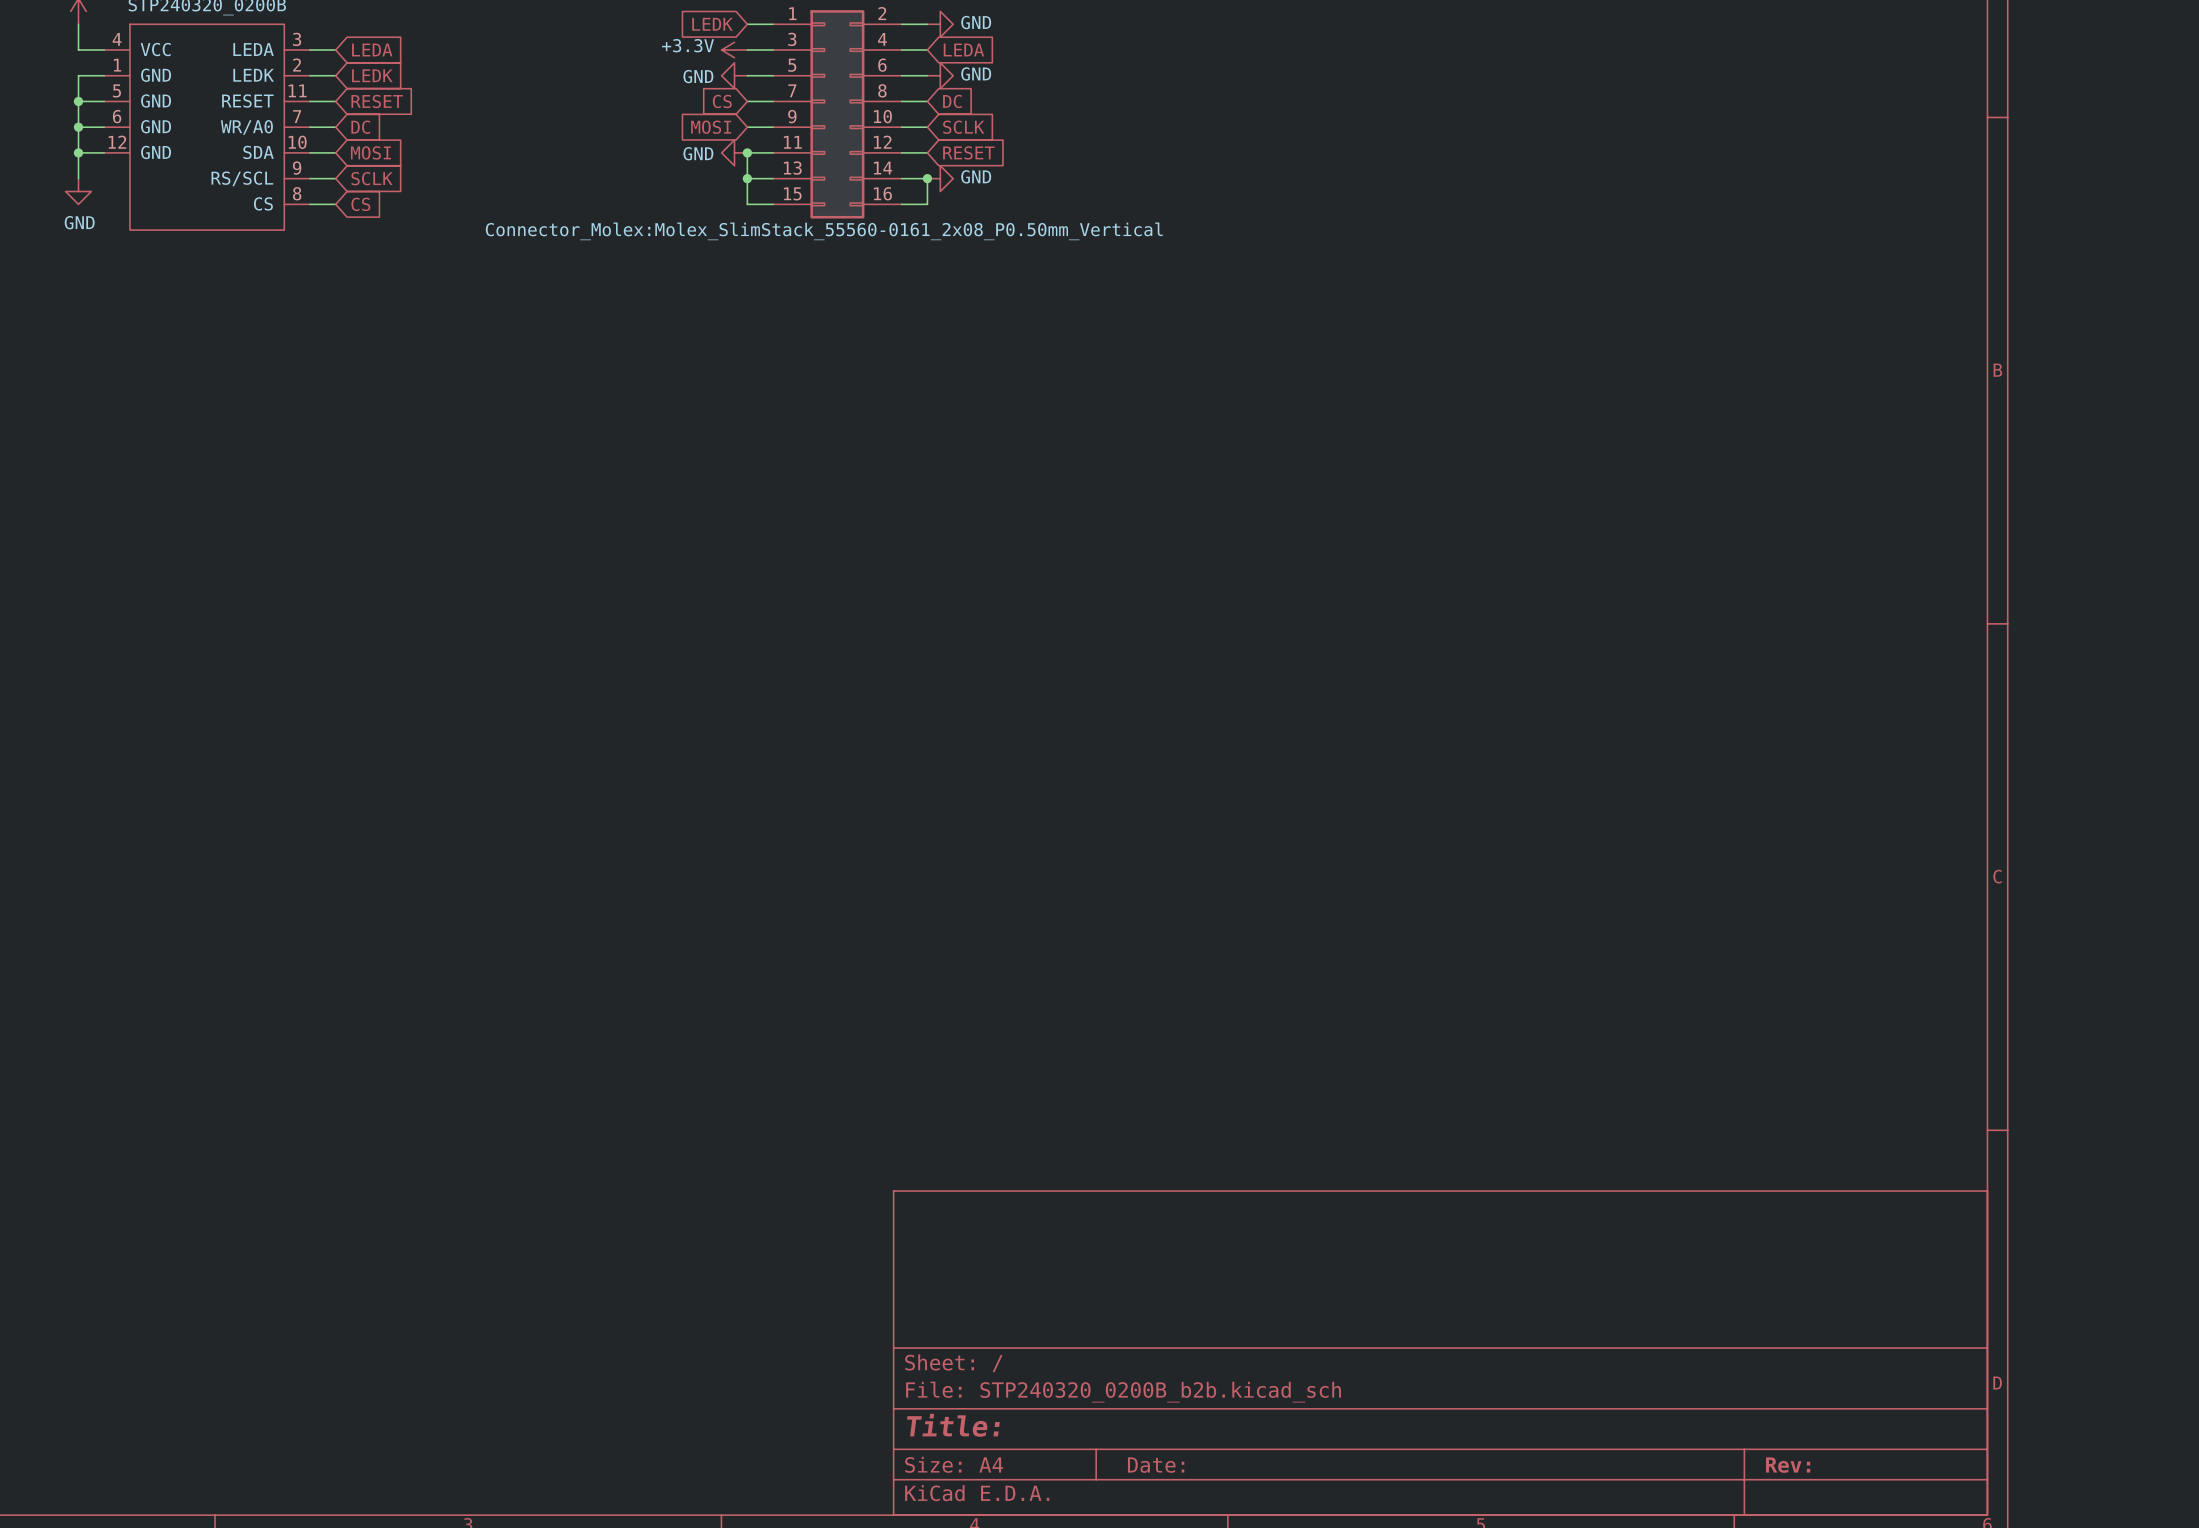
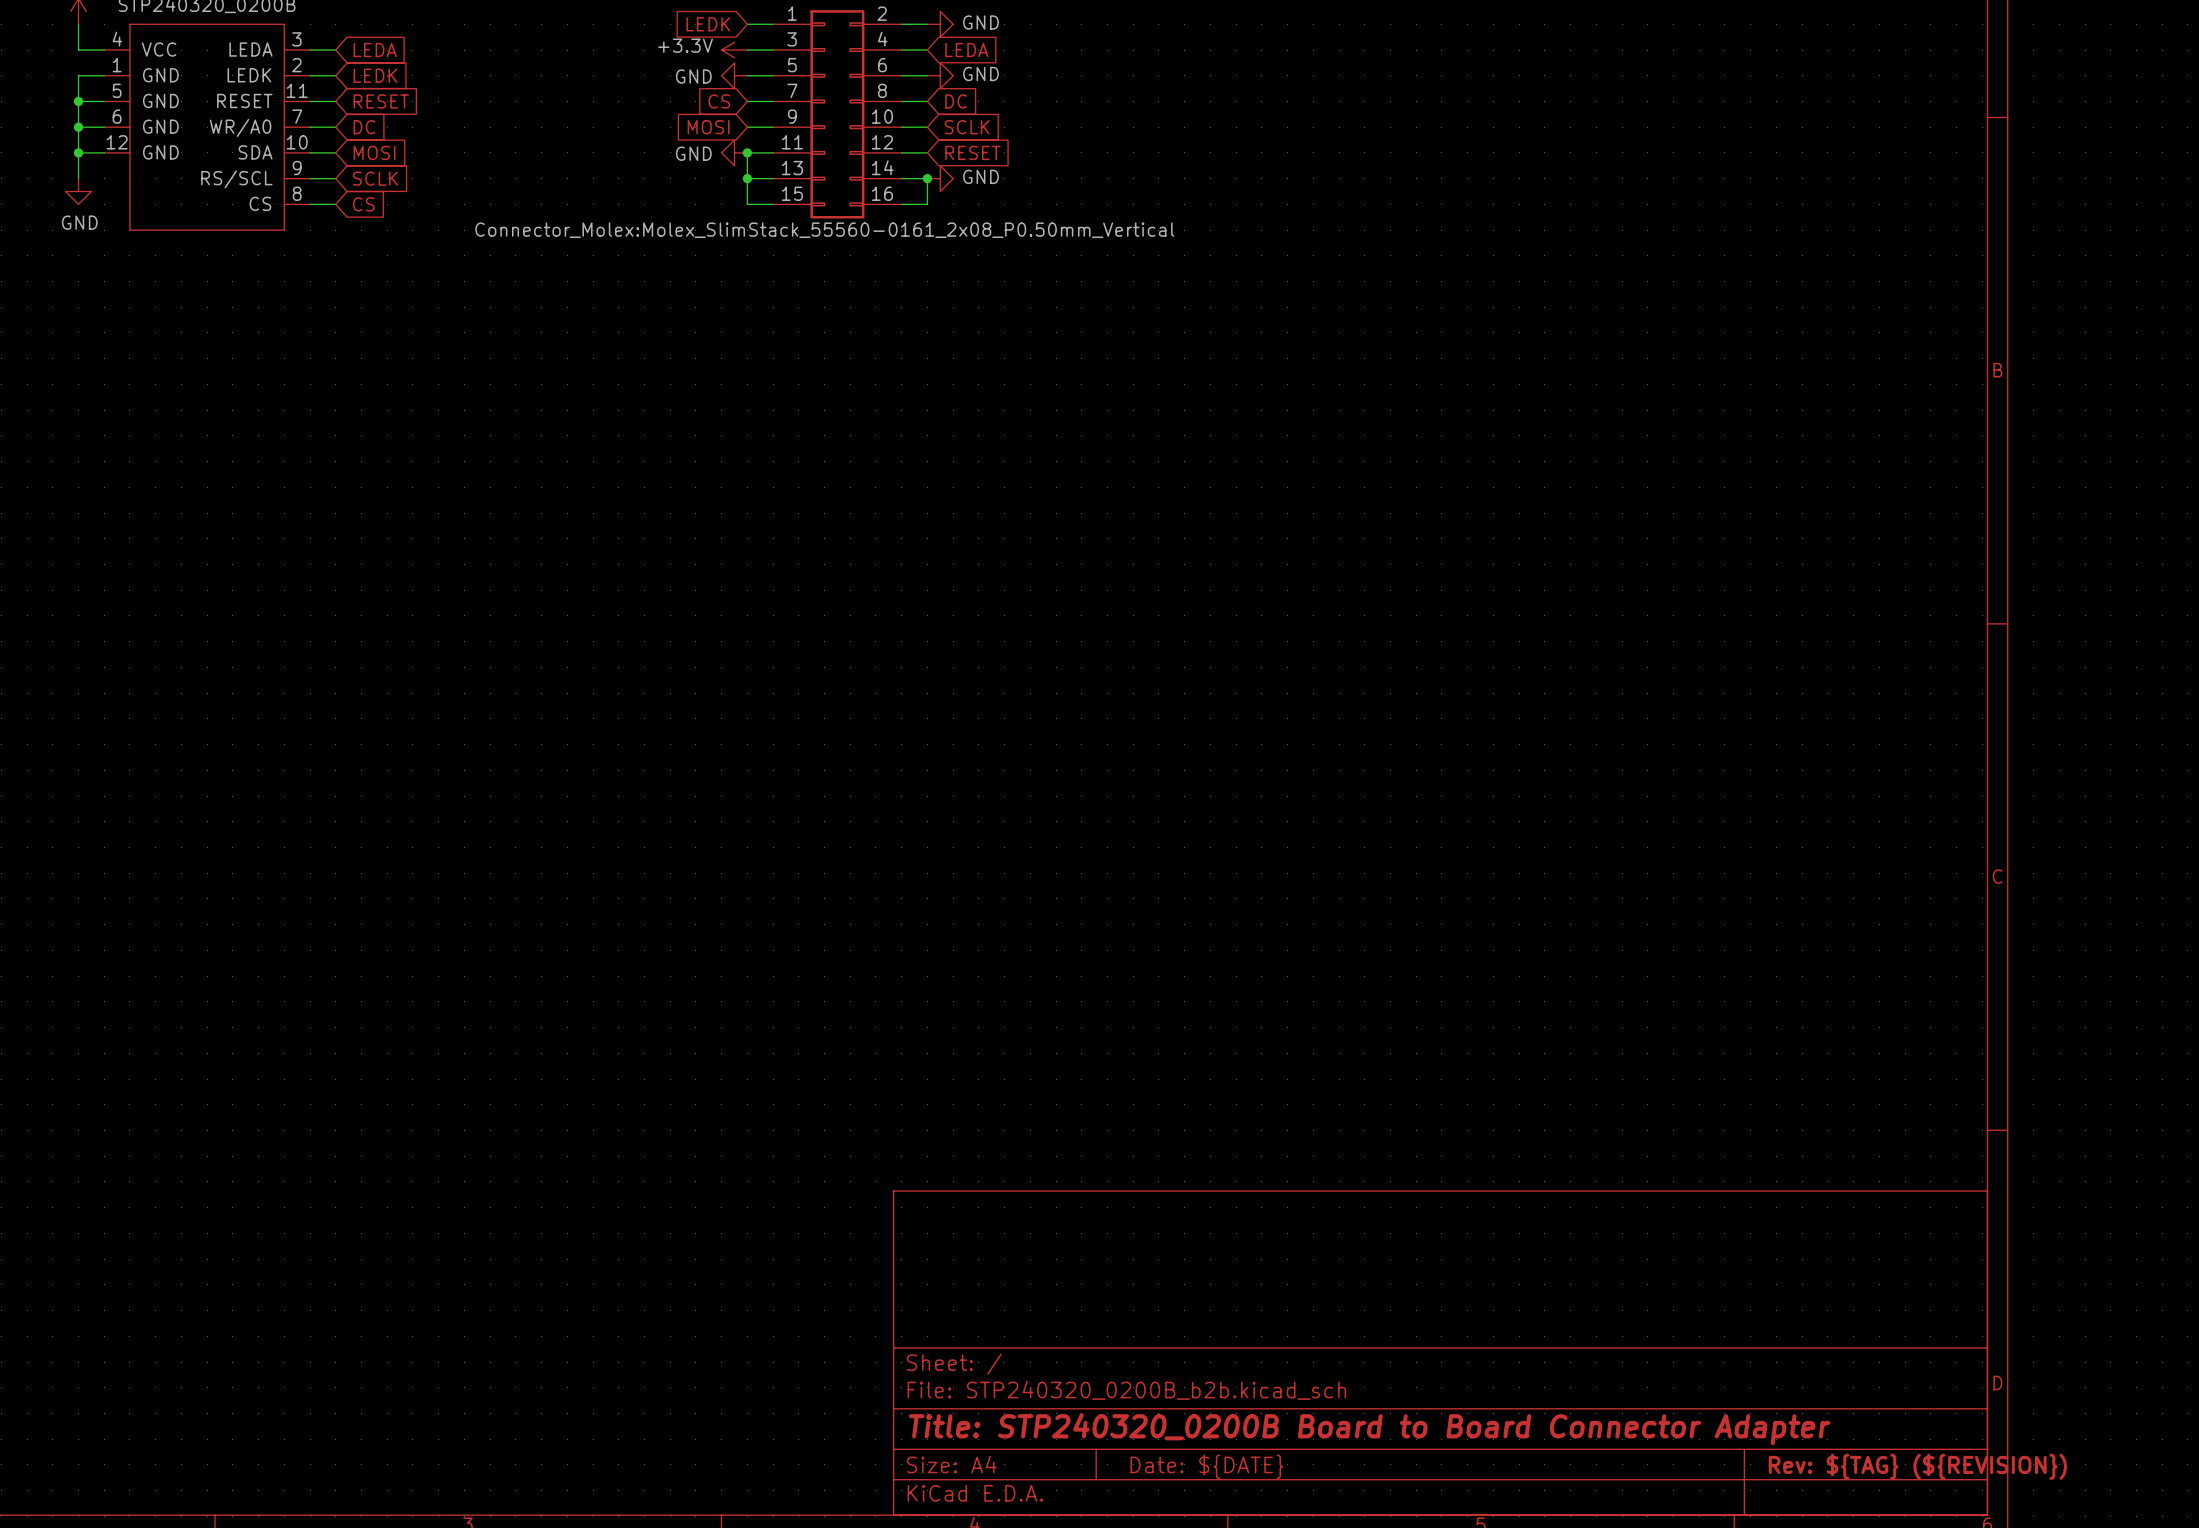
title block: Title: (953, 1425) -> Title: STP240320_0200B Board to Board Connector Adapter (1369, 1429)
title block: Date: (1156, 1465) -> Date: ${DATE} (1206, 1466)
title block: Rev: (1788, 1465) -> Rev: ${TAG} (${REVISION}) (1917, 1466)

